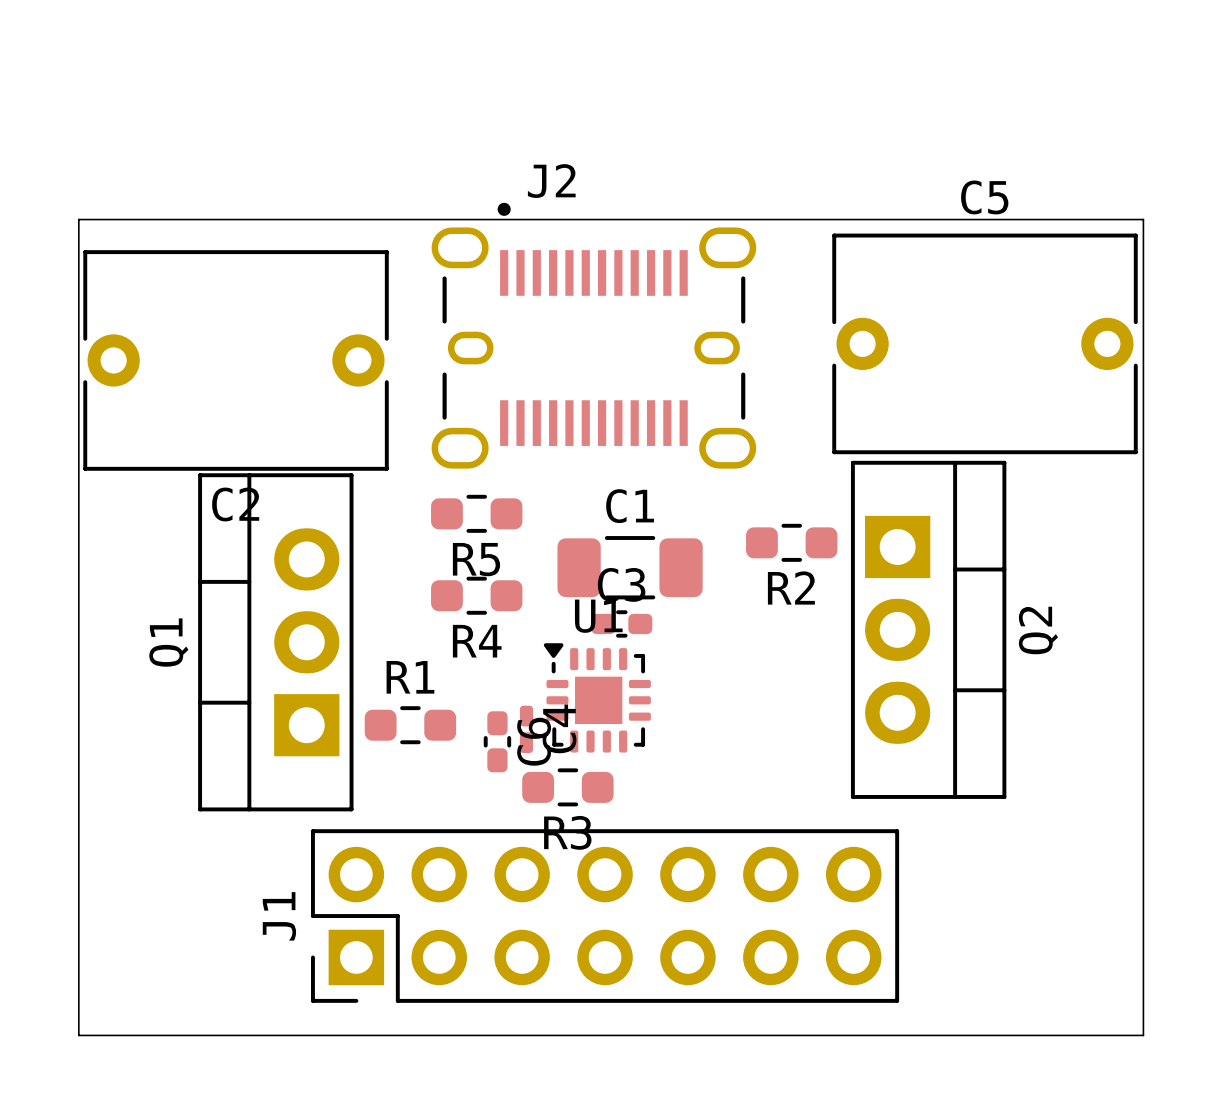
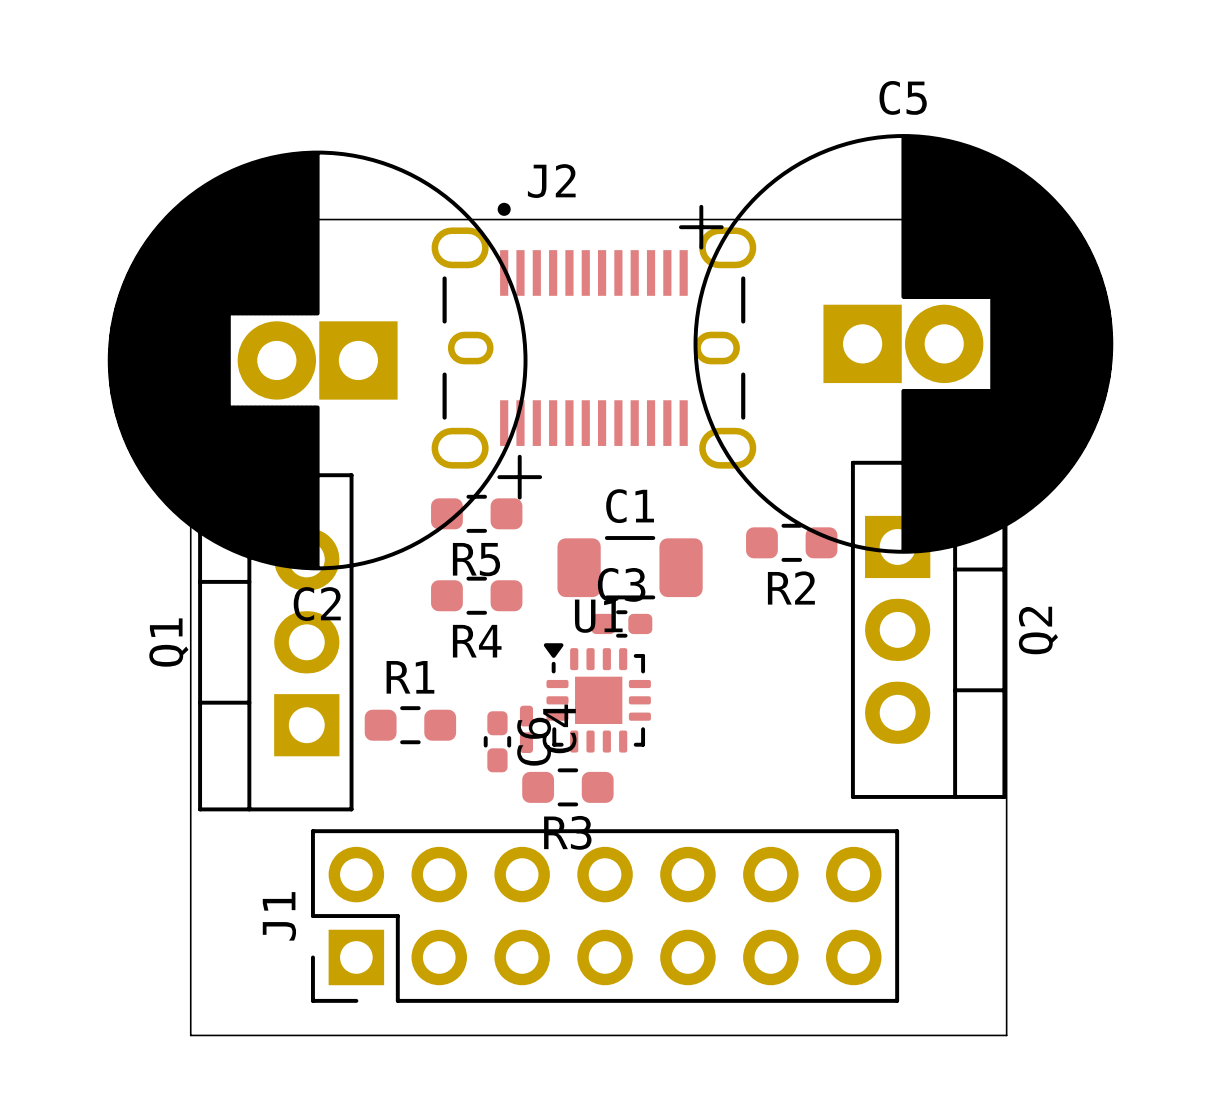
C5 name position: C5 (984, 197) -> C5 (903, 97)
board edge: (190, 219) (78, 219) (78, 1035) (190, 1035) -> (190, 219) (190, 1035)
board edge: (1006, 219) (1143, 219) (1143, 1035) (1006, 1035) -> (1006, 219) (1006, 1035)
C5 footprint: [832, 233, 1138, 455] -> [678, 134, 1114, 554]
C2 footprint: [83, 250, 389, 471] -> [107, 150, 543, 571]
C2 name position: C2 (235, 504) -> C2 (317, 604)

